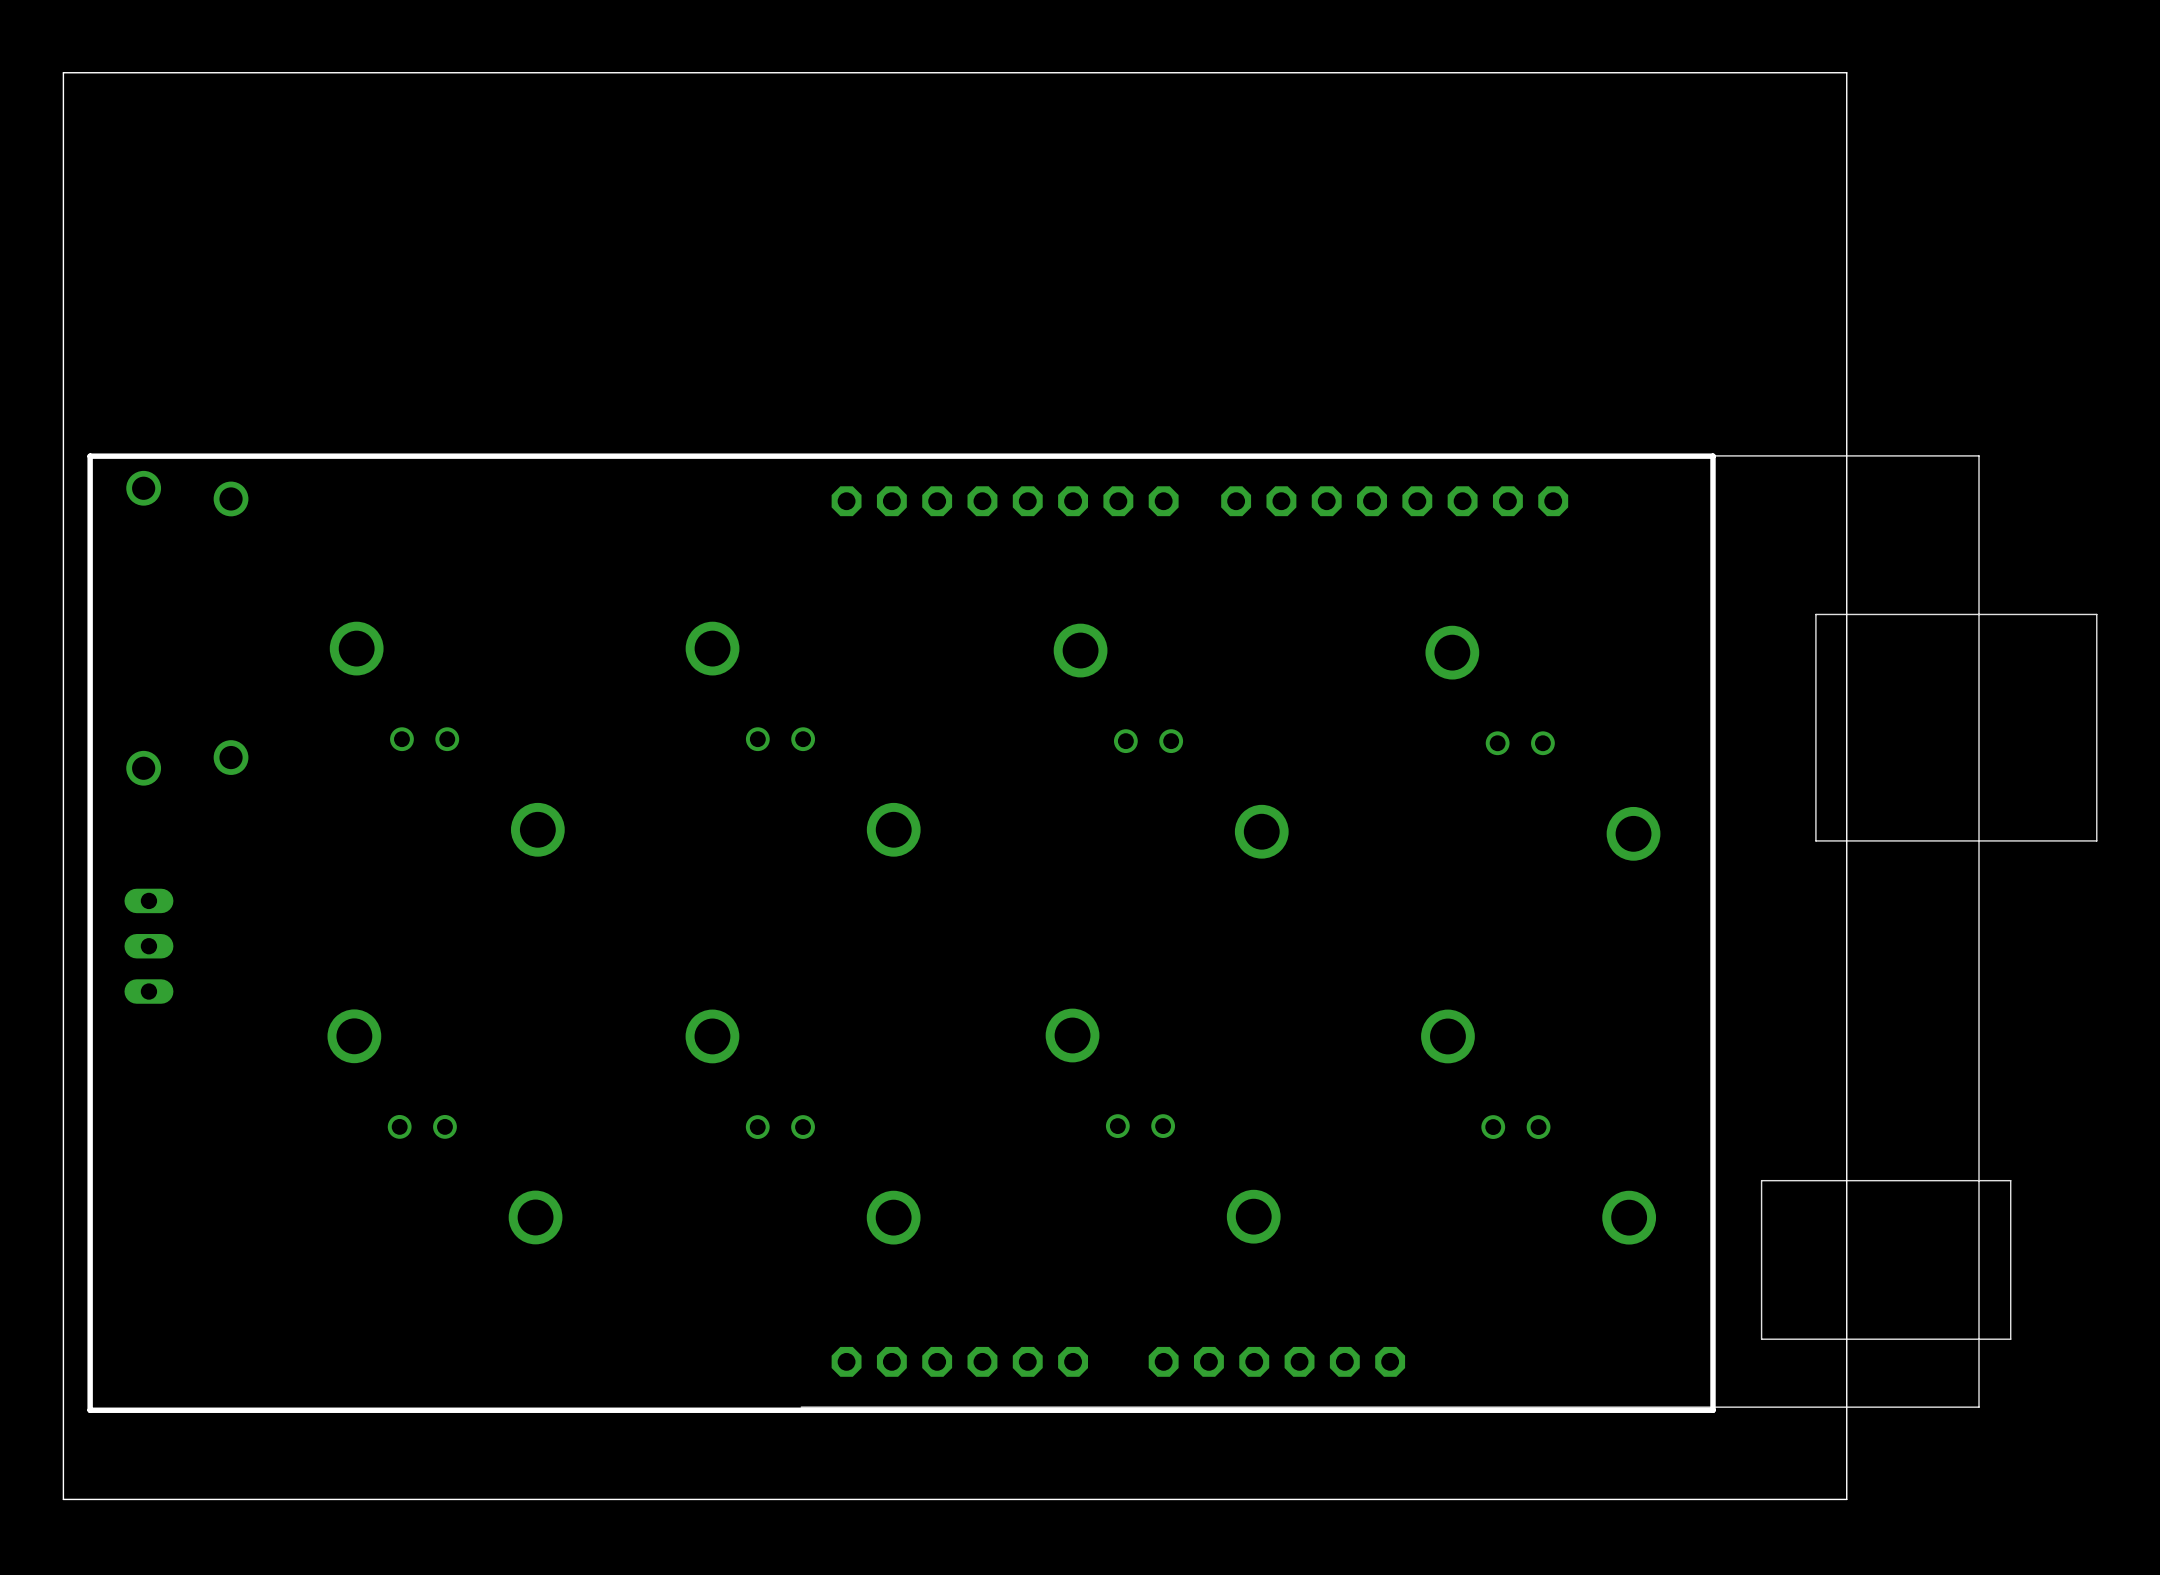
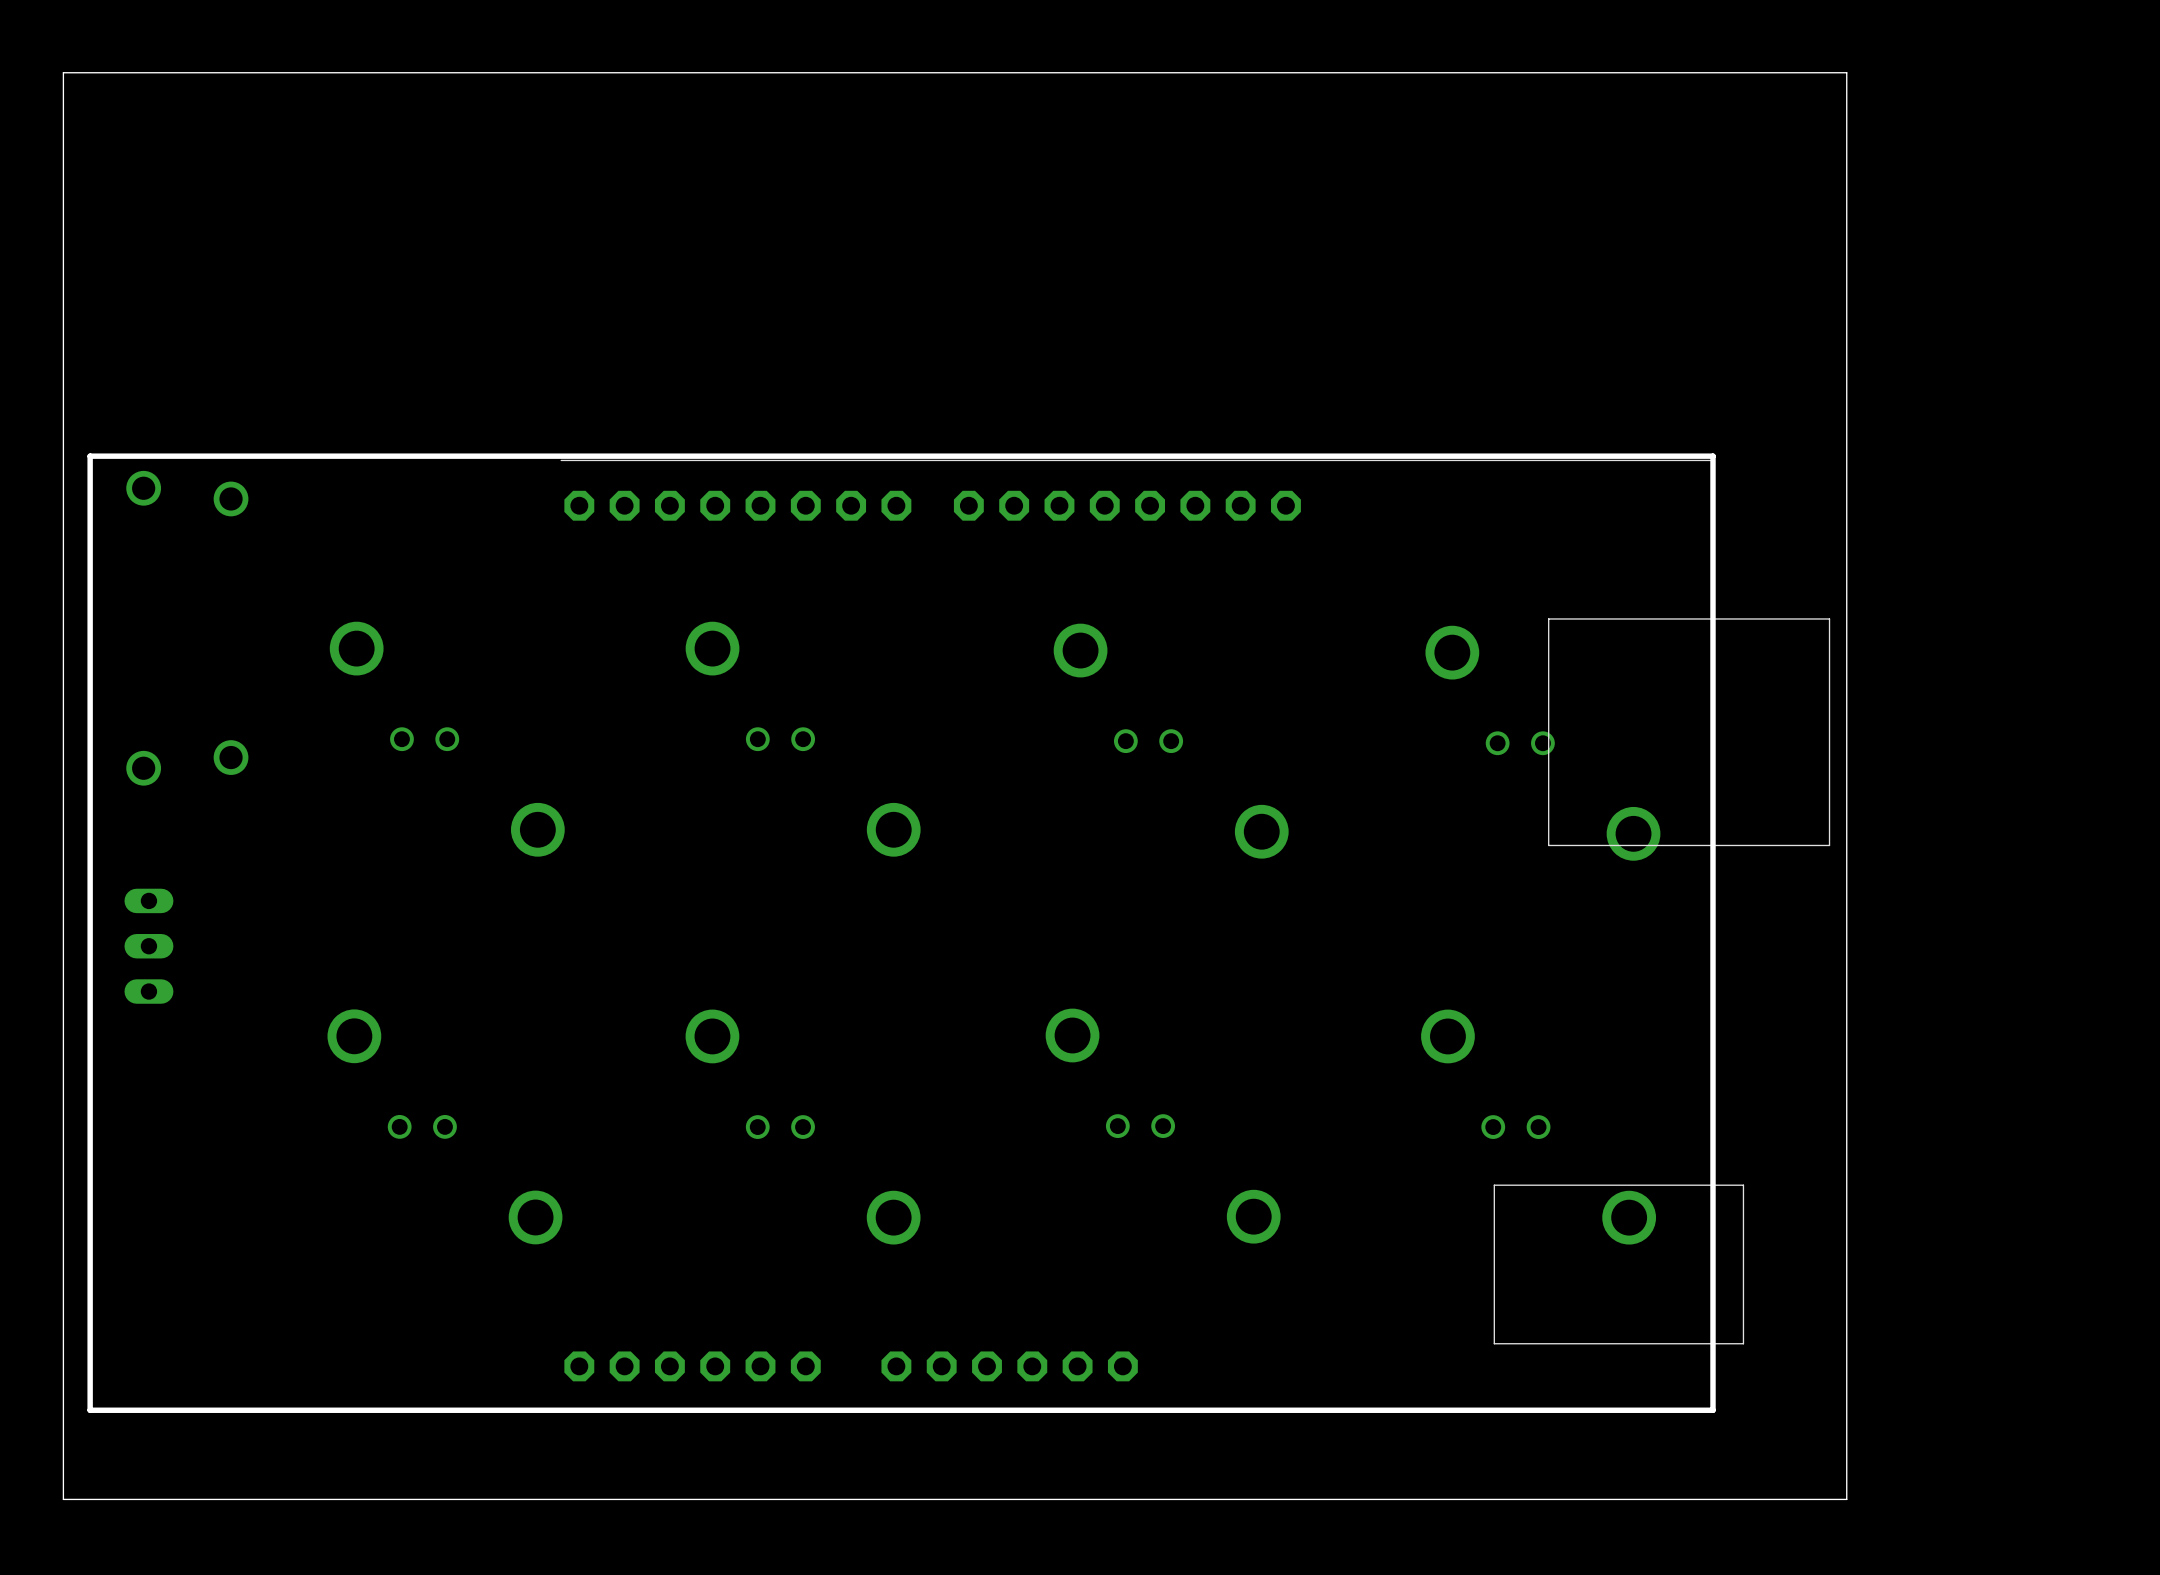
part position: (1449, 931) -> (1181, 936)

